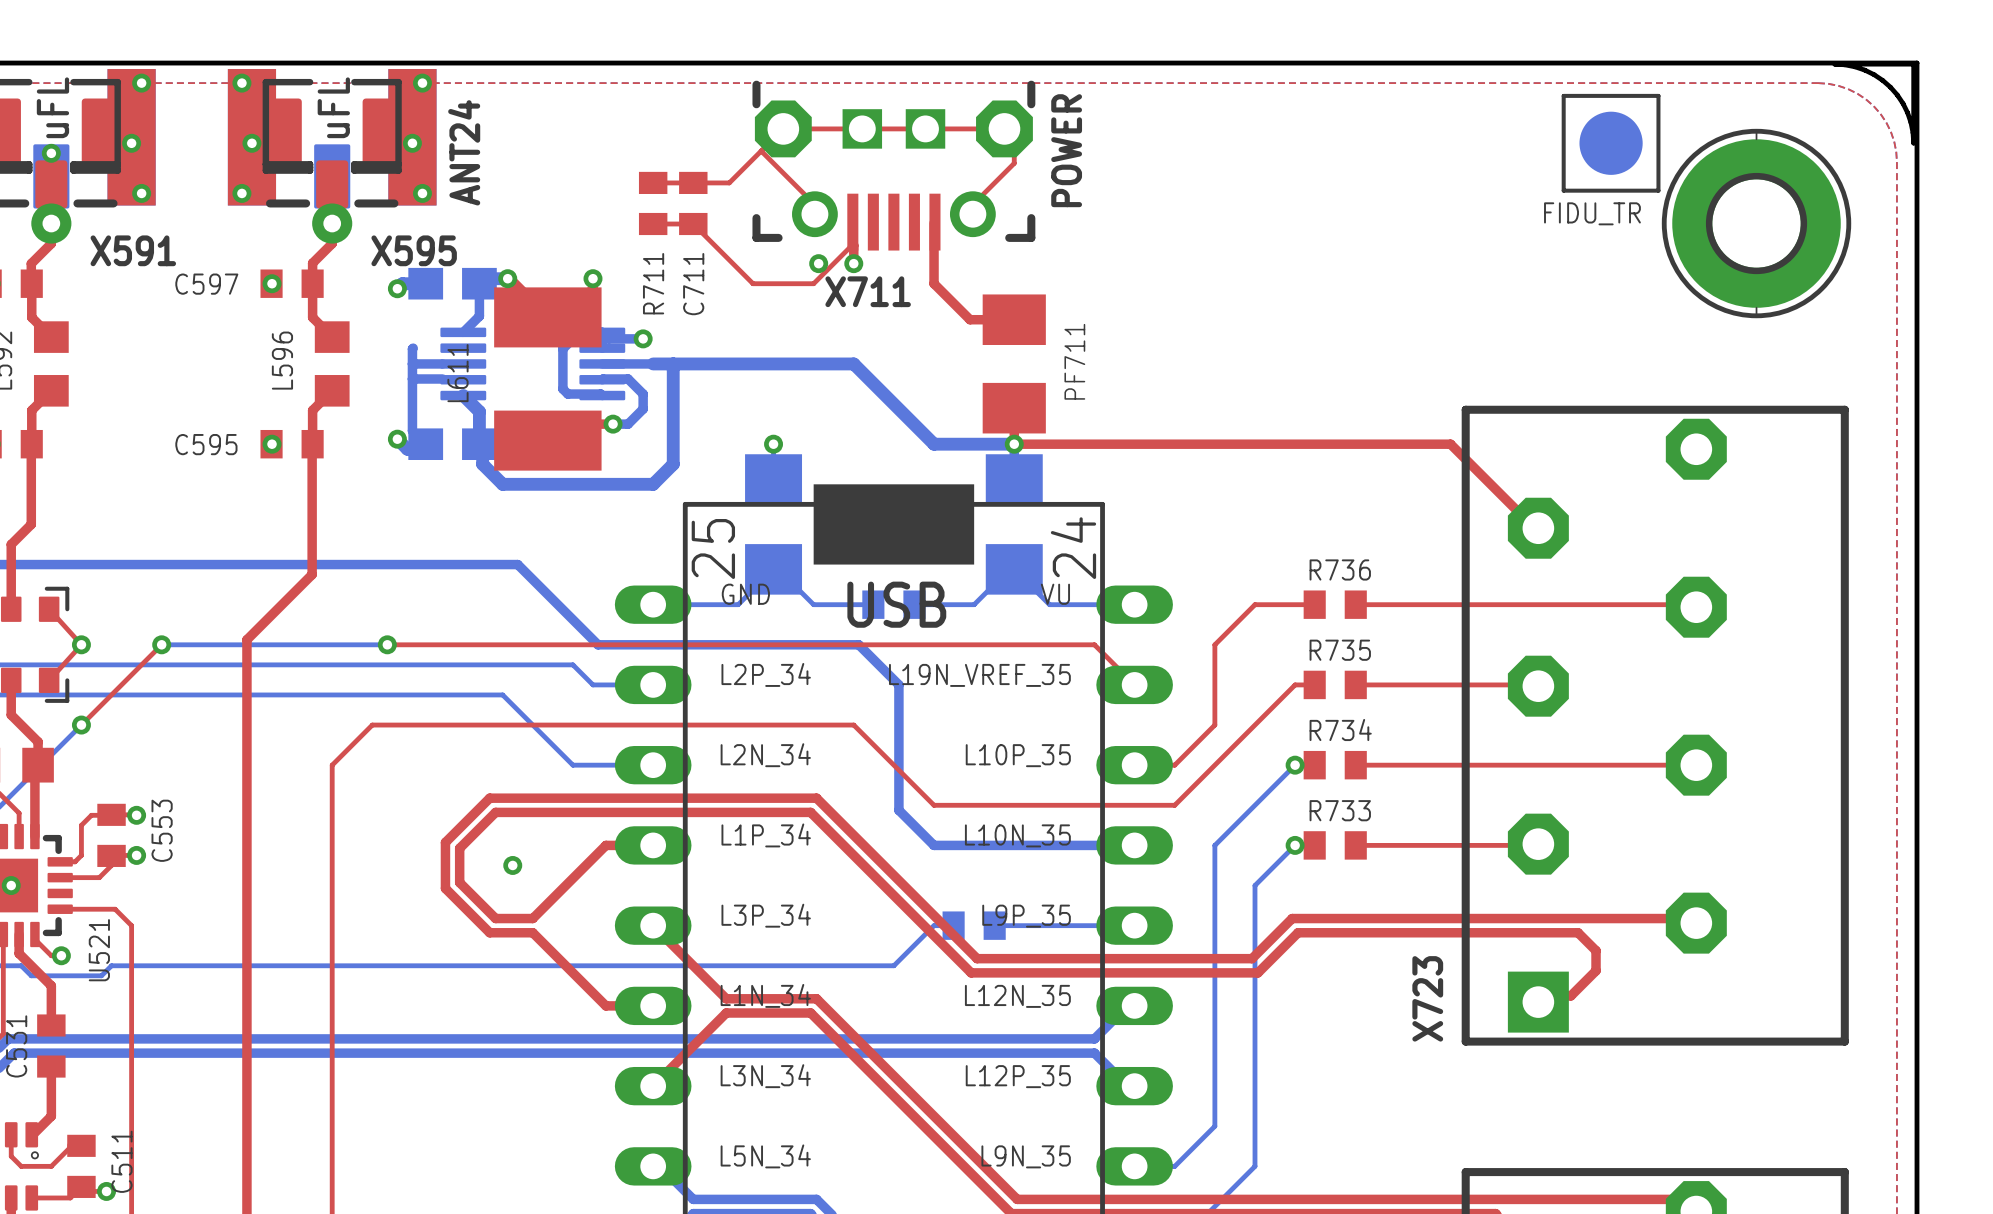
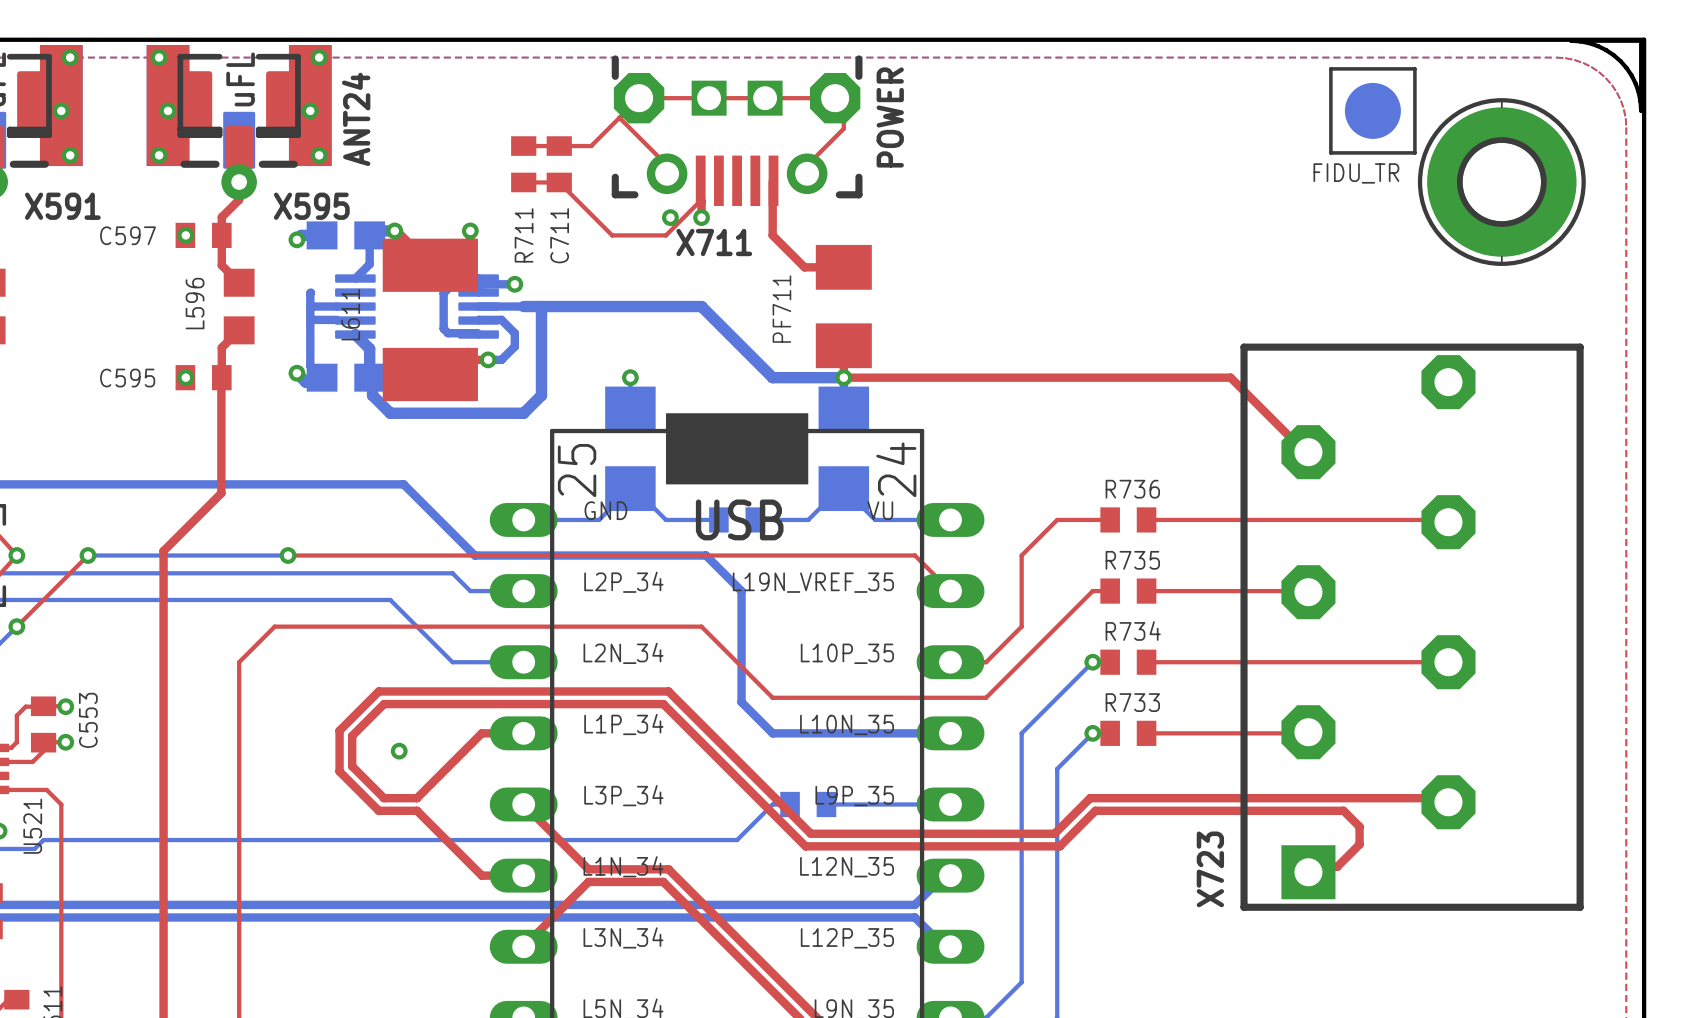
PF711 name position: PF711 (1074, 361) -> PF711 (781, 309)

